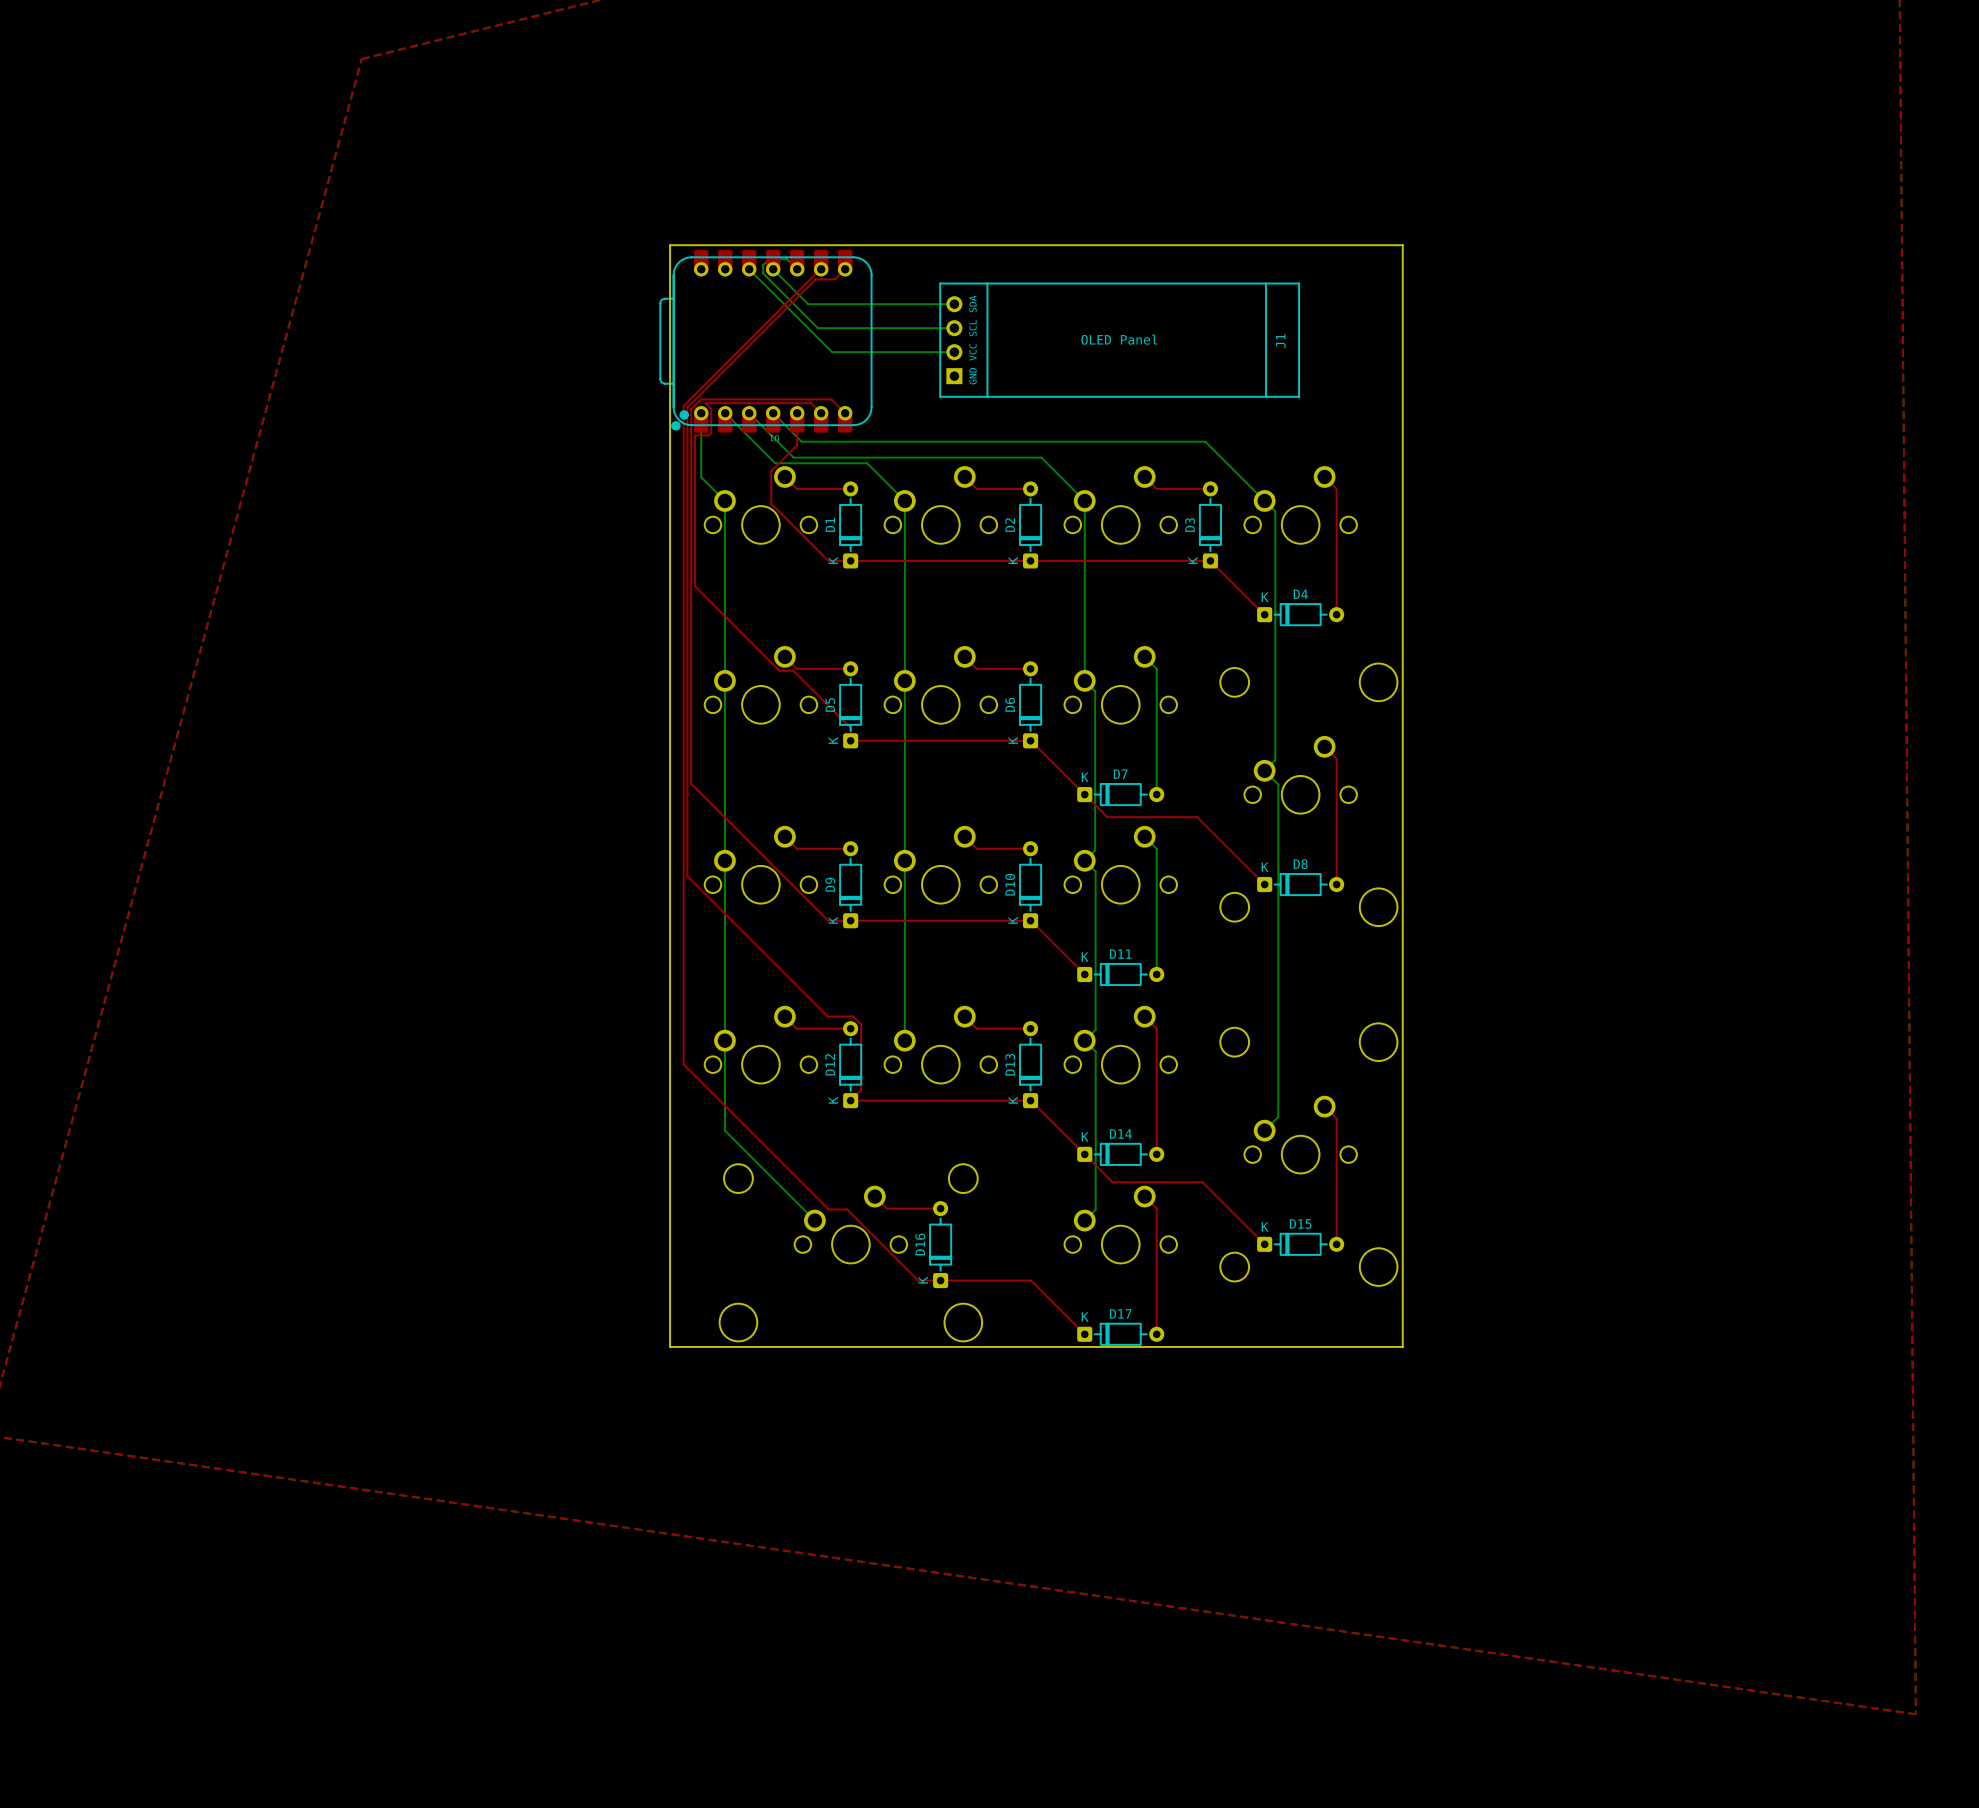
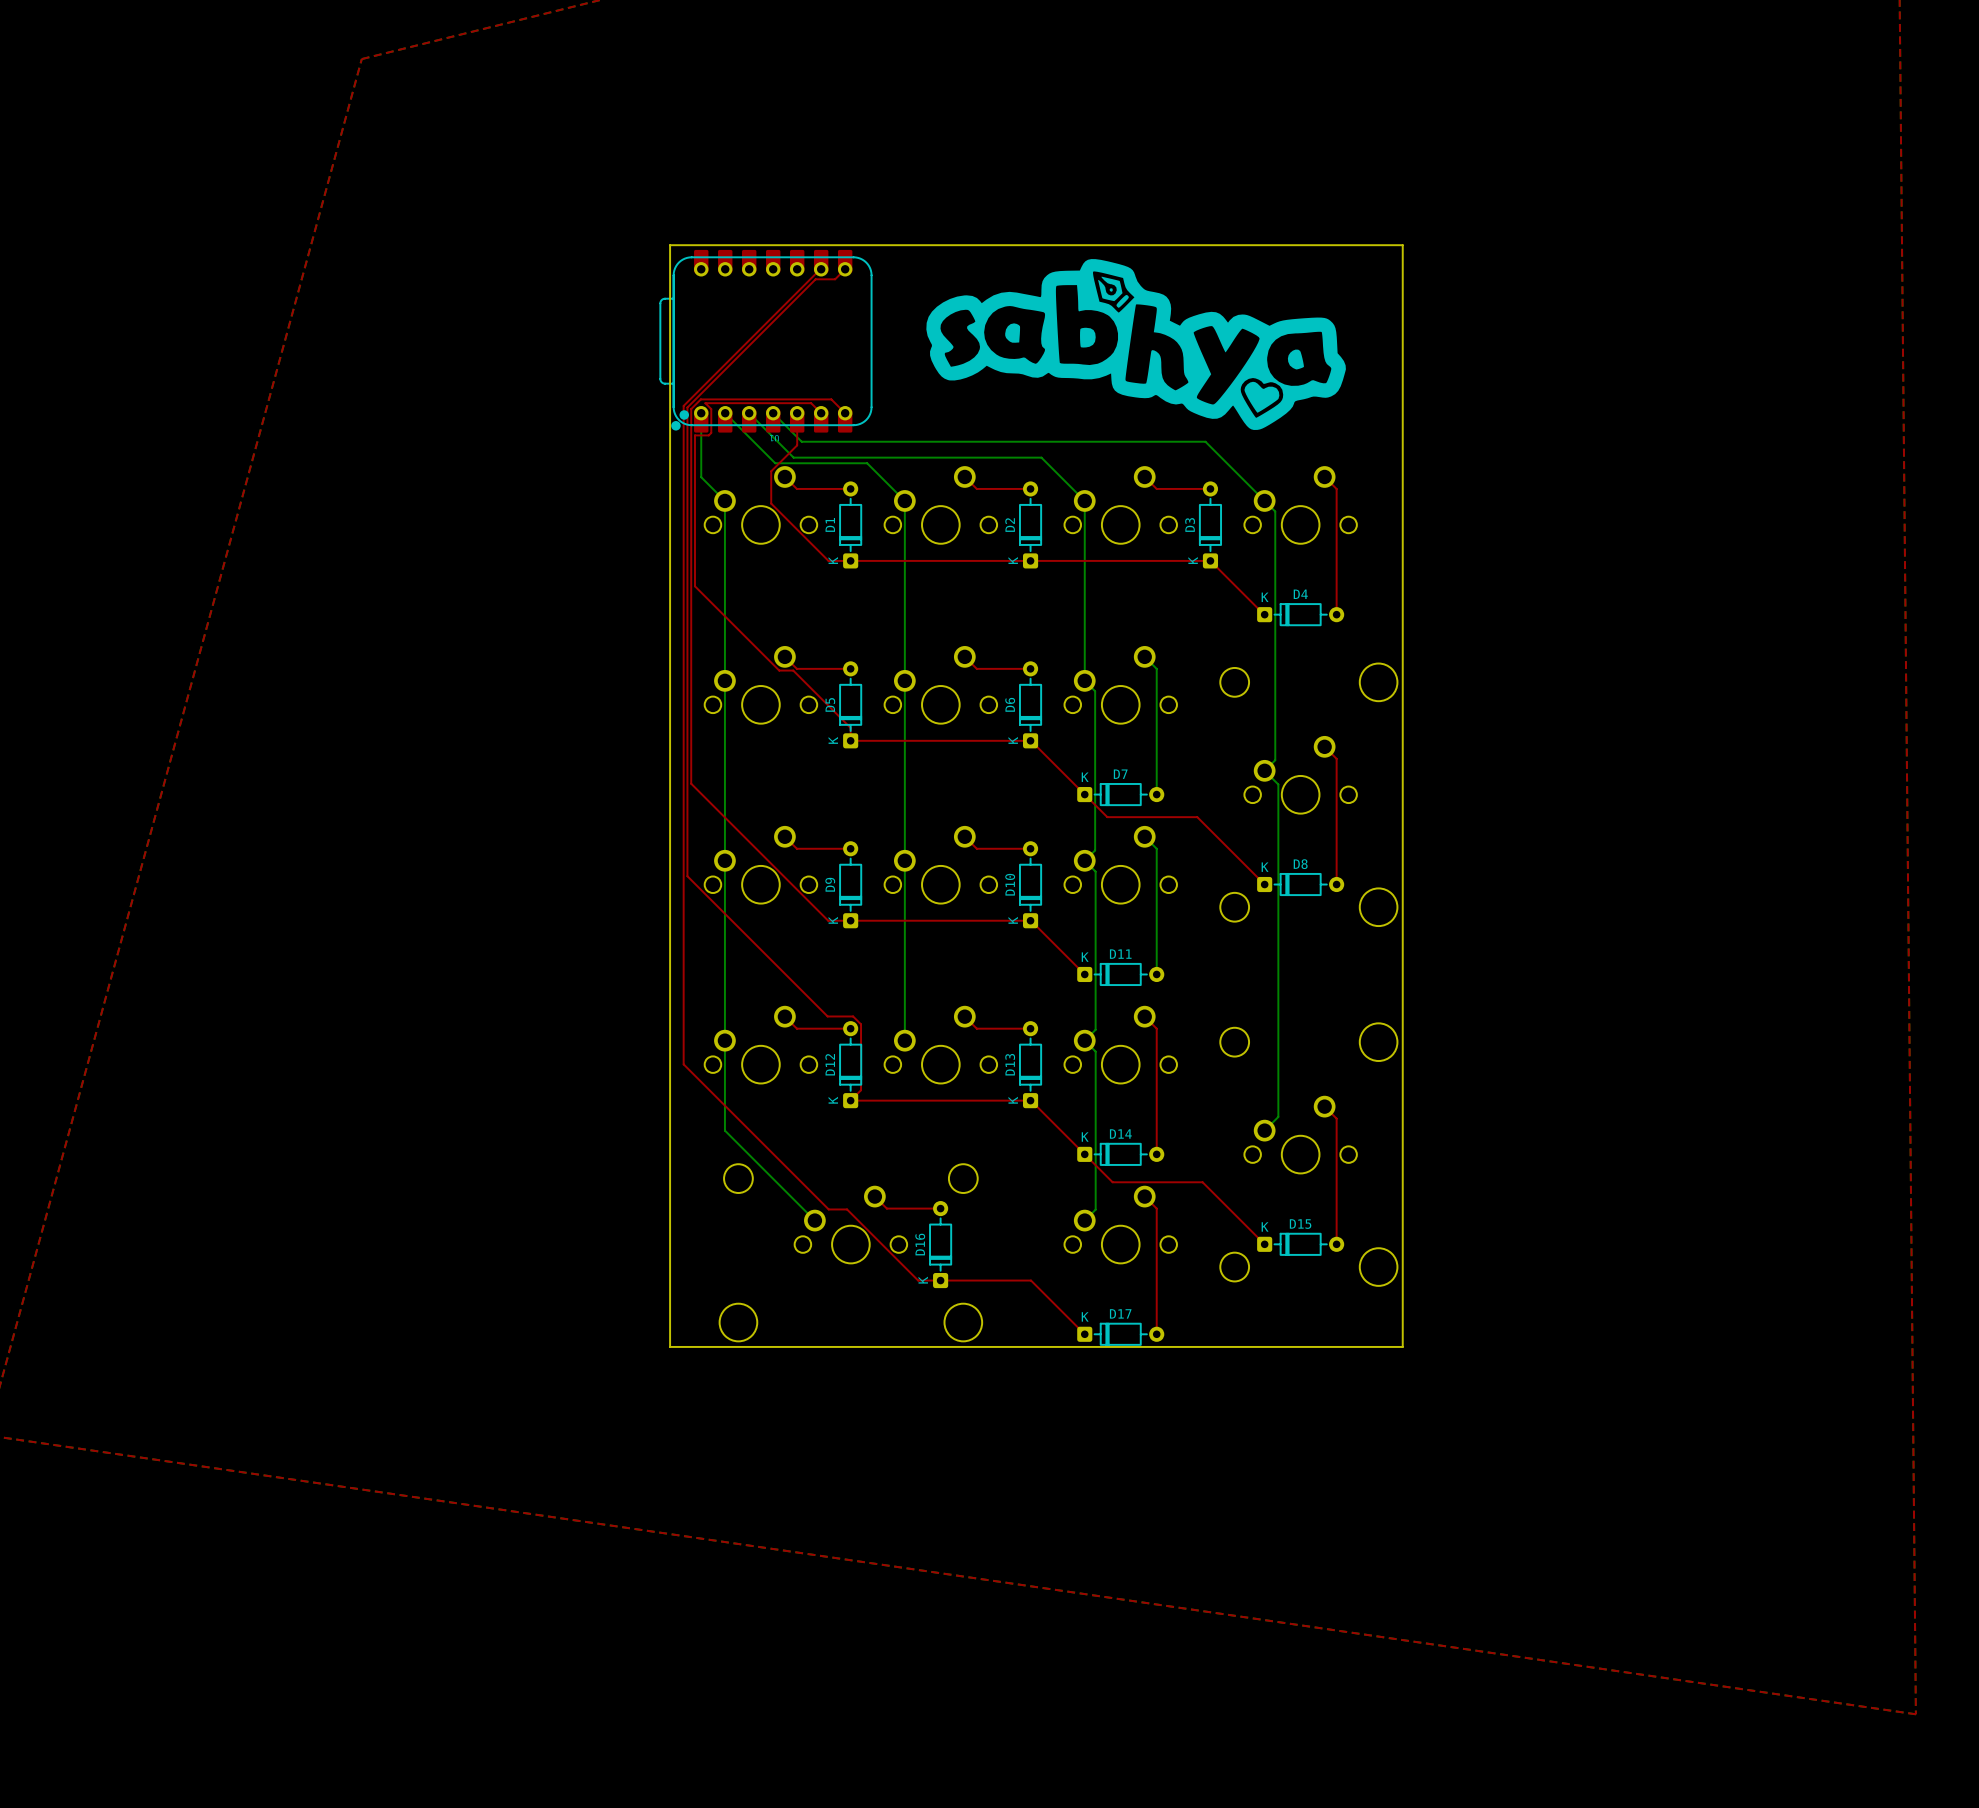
drawing: none -> [926, 259, 1346, 430]
bottom track: (749, 269) (832, 352) (954, 352) -> none
bottom track: (773, 269) (808, 304) (954, 304) -> none
bottom track: (797, 269) (787, 259) (769, 259) (763, 265) (763, 273) (817, 328) (954, 328) -> none
J1: (1119, 340) -> none

